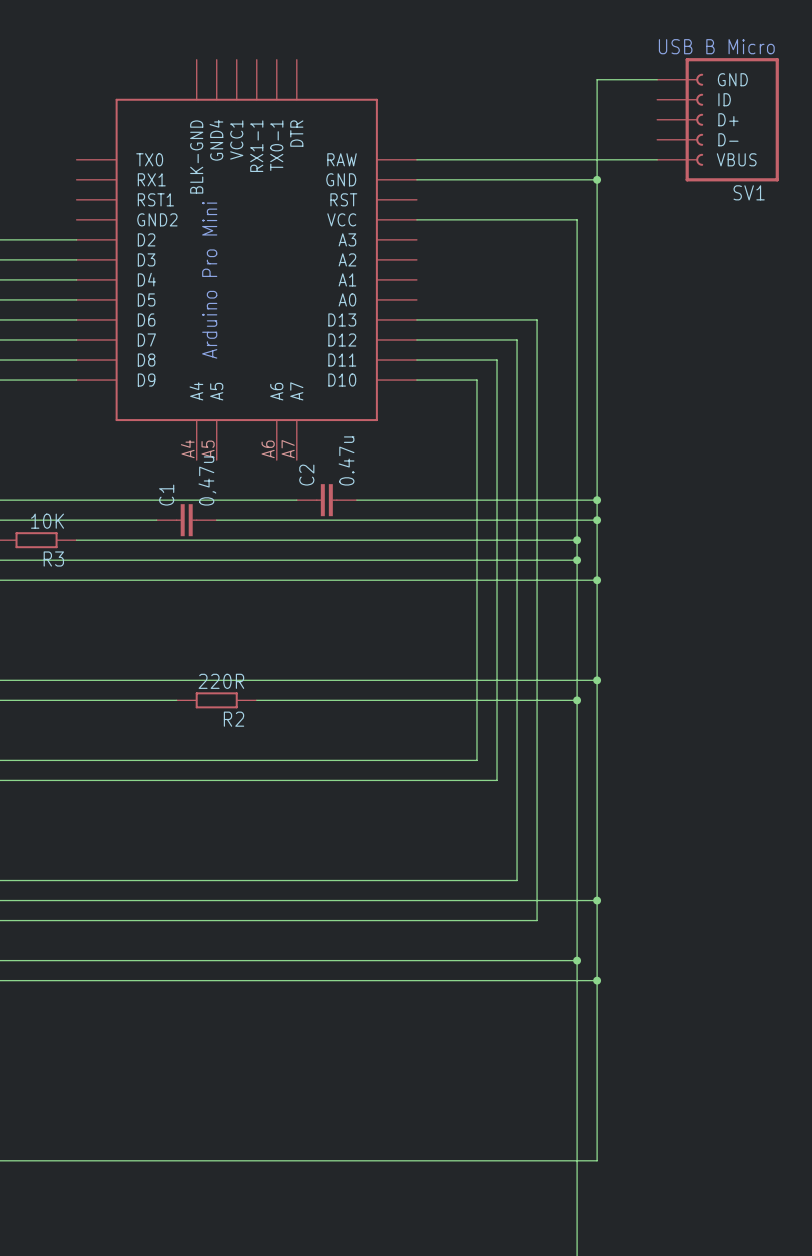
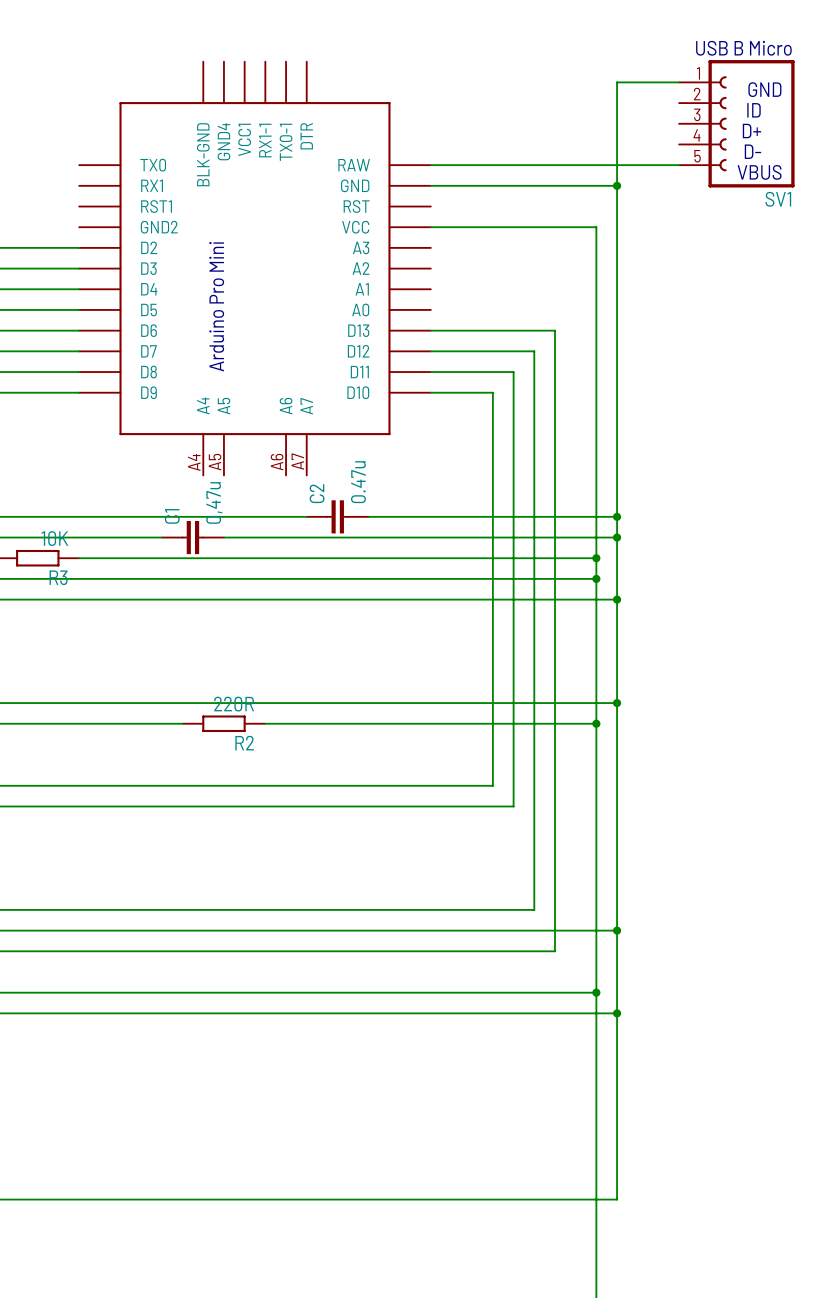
SV1 symbol: [657, 58, 779, 182] -> [679, 60, 795, 188]

